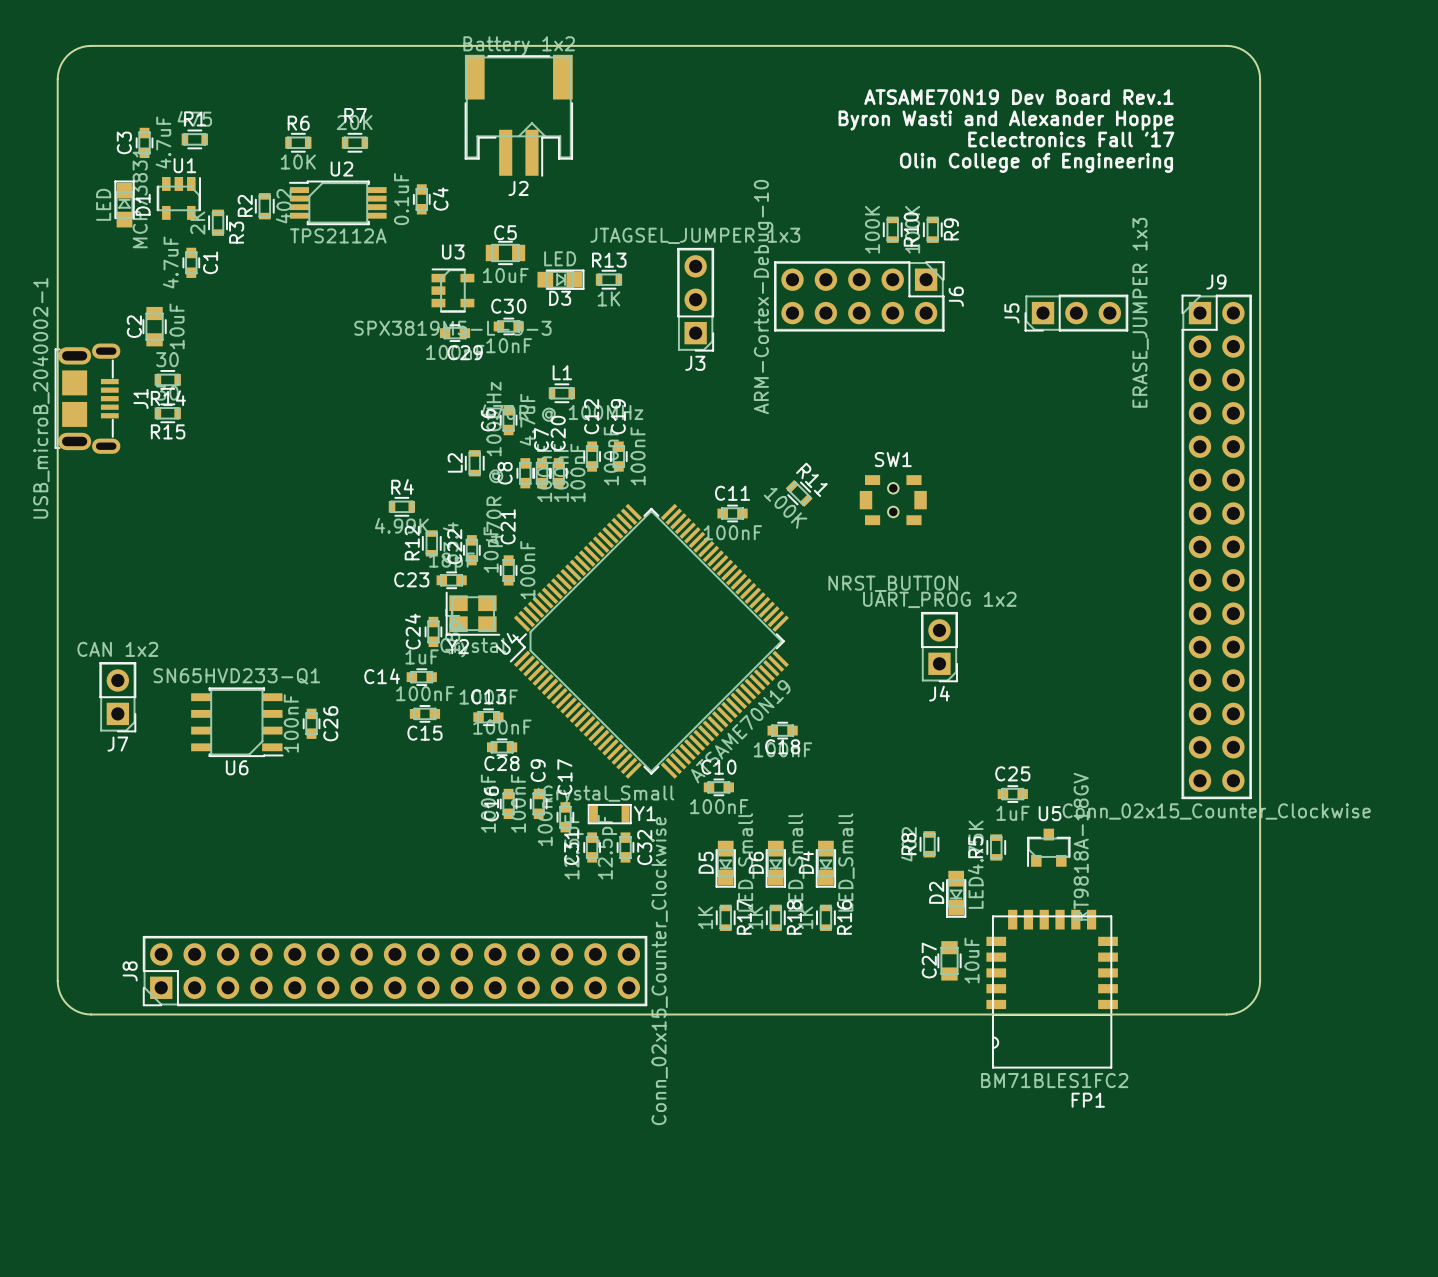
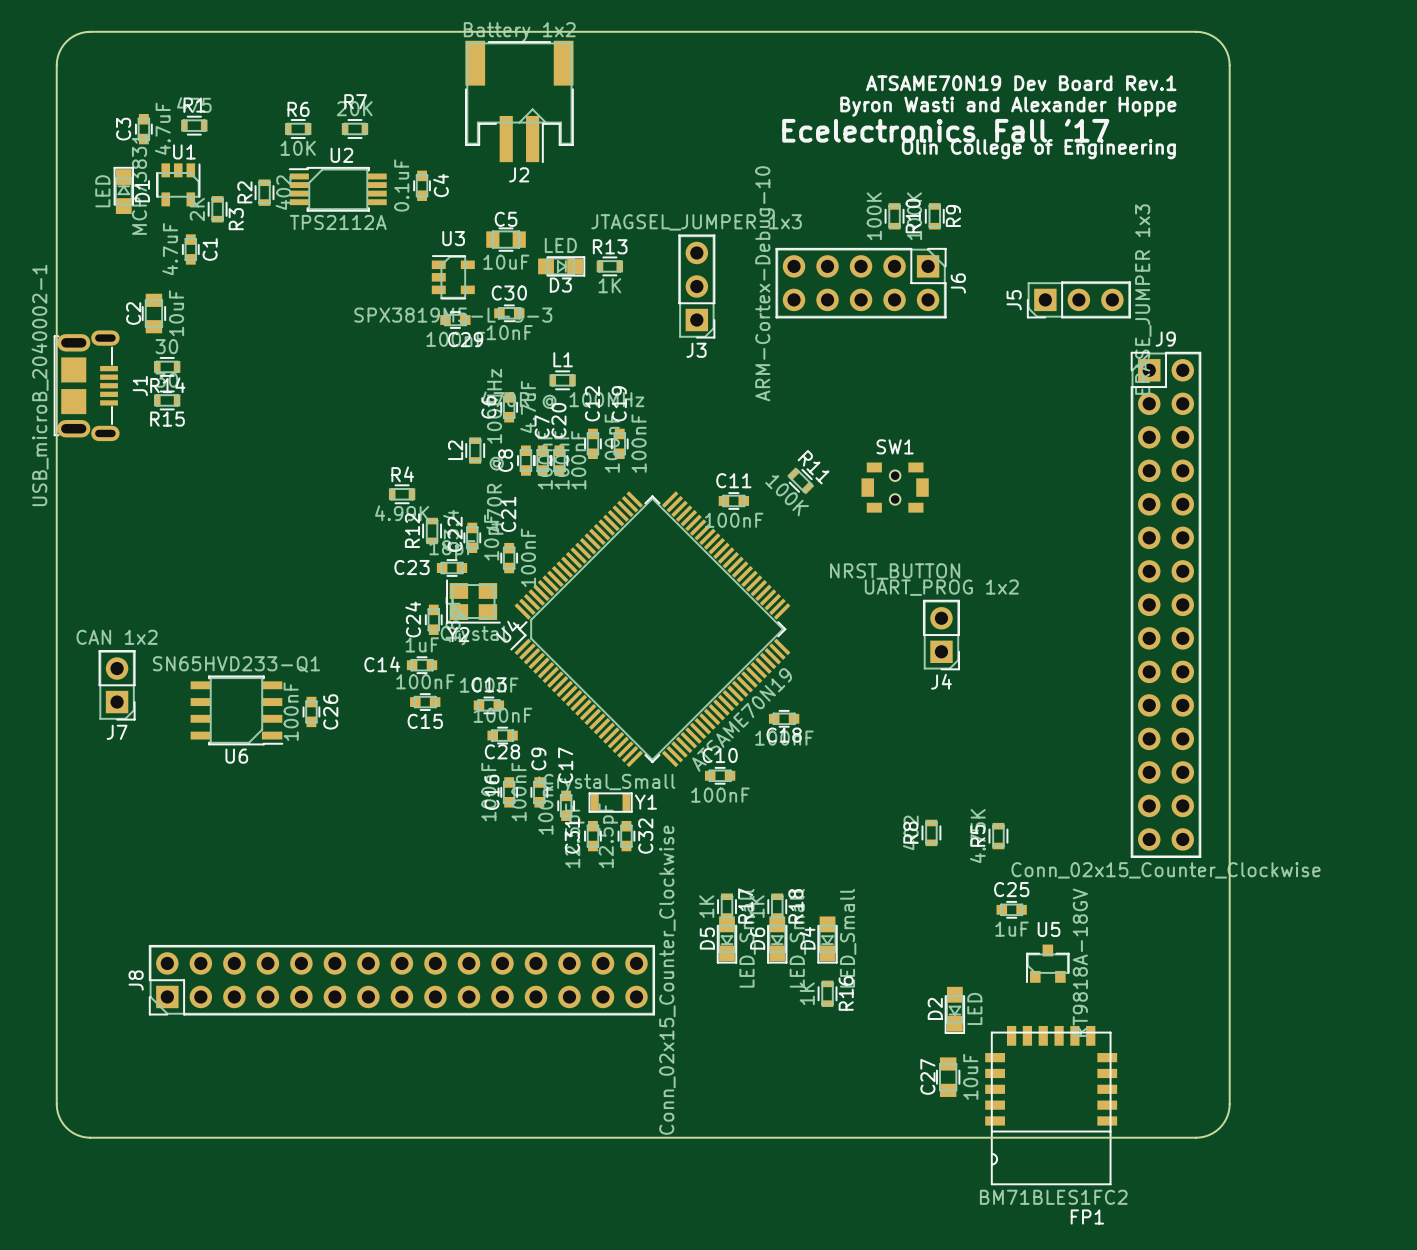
board edge: (1193, 45) (1231, 46) (1243, 50) (1255, 62) (1260, 79) (1260, 981) (1255, 997) (1247, 1007) (1239, 1011) (1226, 1014) (91, 1014) (78, 1011) (67, 1004) (60, 993) (57, 981) -> (1196, 31) (1208, 34) (1219, 41) (1227, 52) (1229, 65) (1229, 1104) (1225, 1120) (1216, 1130) (1204, 1136) (1196, 1137) (85, 1137) (73, 1133) (66, 1127) (59, 1117) (57, 1108) (56, 970)
text: Eclectronics Fall '17 (1071, 139) -> Ecelectronics Fall '17 (945, 130)
J9 position: (1216, 546) -> (1166, 604)
C25 position: (1012, 794) -> (1011, 909)
U5 position: (1048, 847) -> (1047, 963)
D5 position: (725, 864) -> (727, 939)
D6 position: (775, 864) -> (777, 939)
D4 position: (825, 864) -> (827, 939)
D2 position: (956, 894) -> (954, 1010)
R16 position: (825, 917) -> (827, 993)
C27 position: (949, 960) -> (948, 1077)
J8 position: (395, 971) -> (401, 980)
FP1 position: (1052, 989) -> (1051, 1105)

